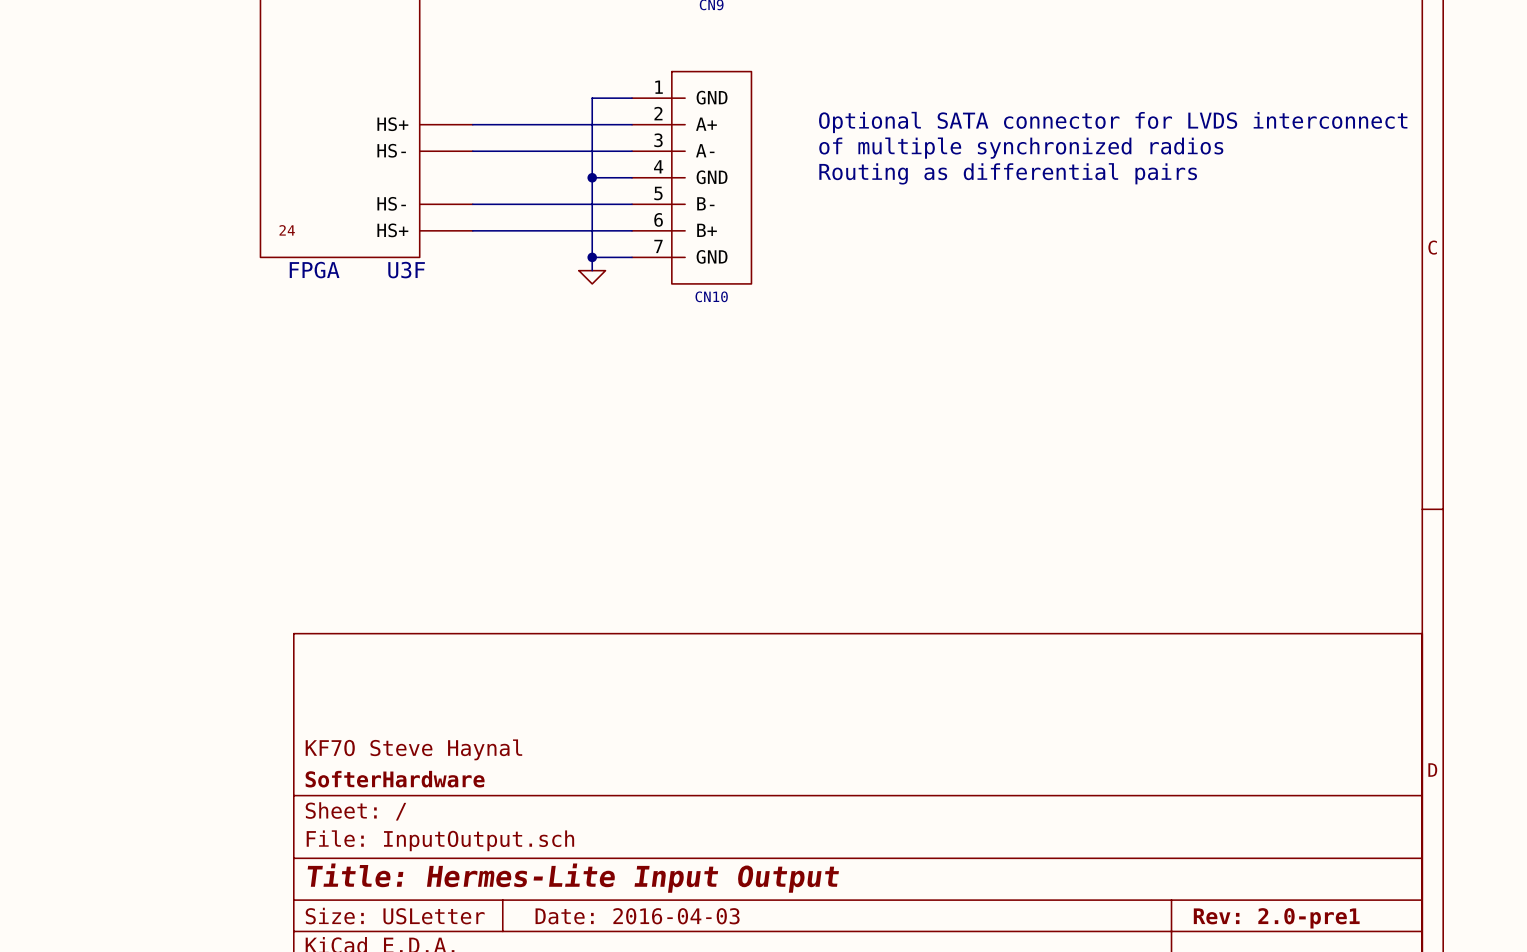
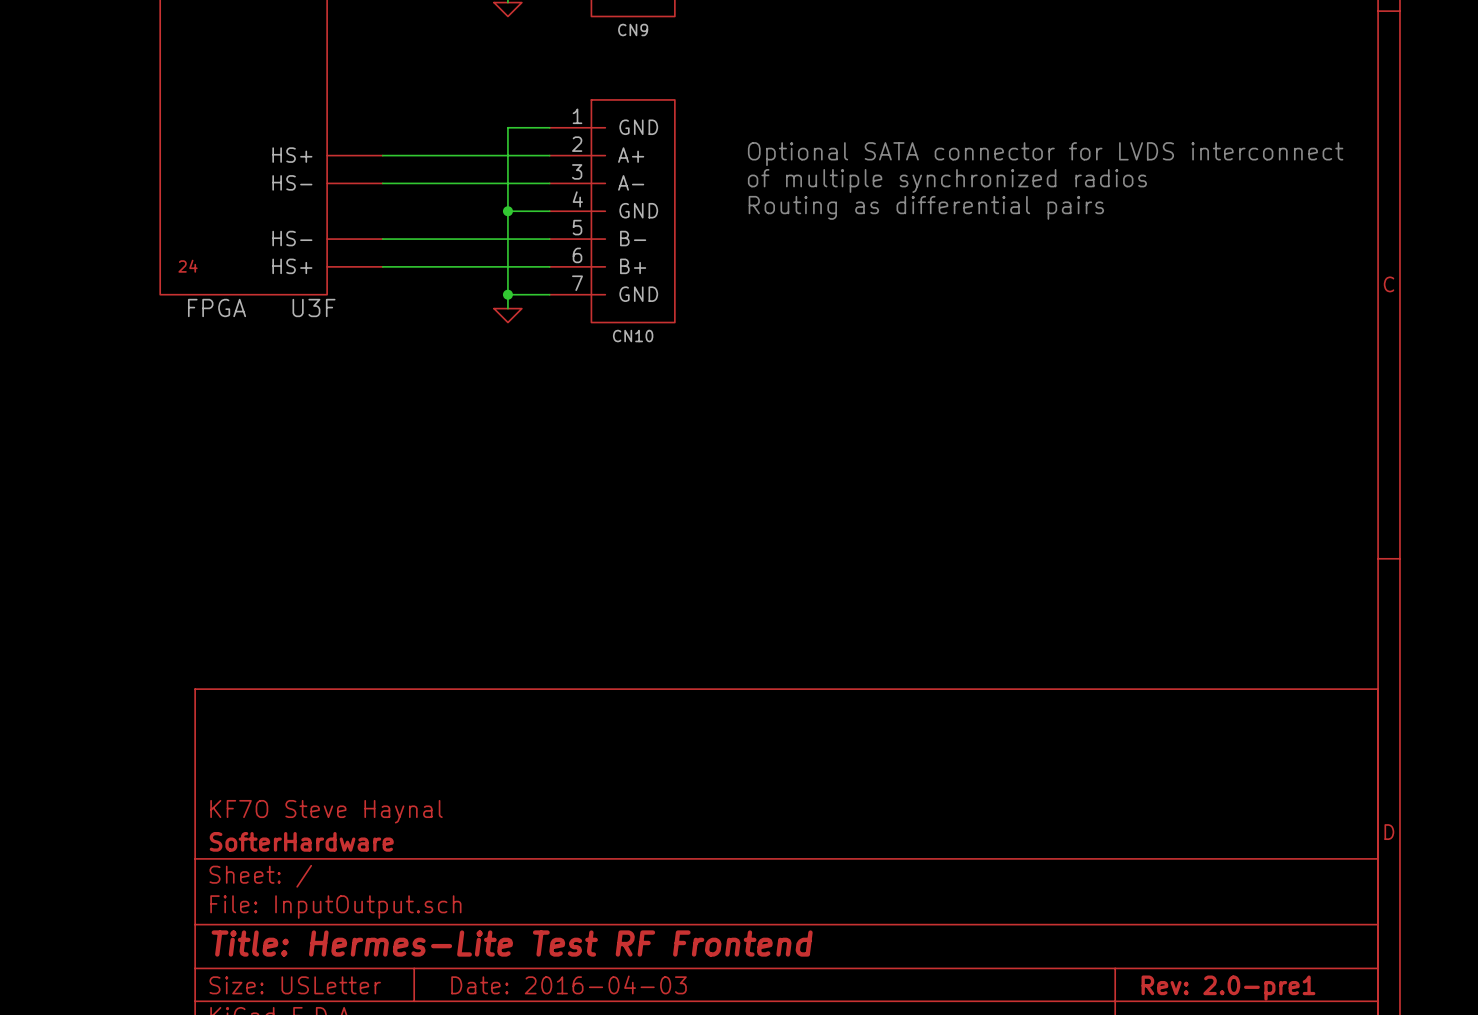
title block: Title: Hermes-Lite Input Output (573, 878) -> Title: Hermes-Lite Test RF Frontend (512, 943)

